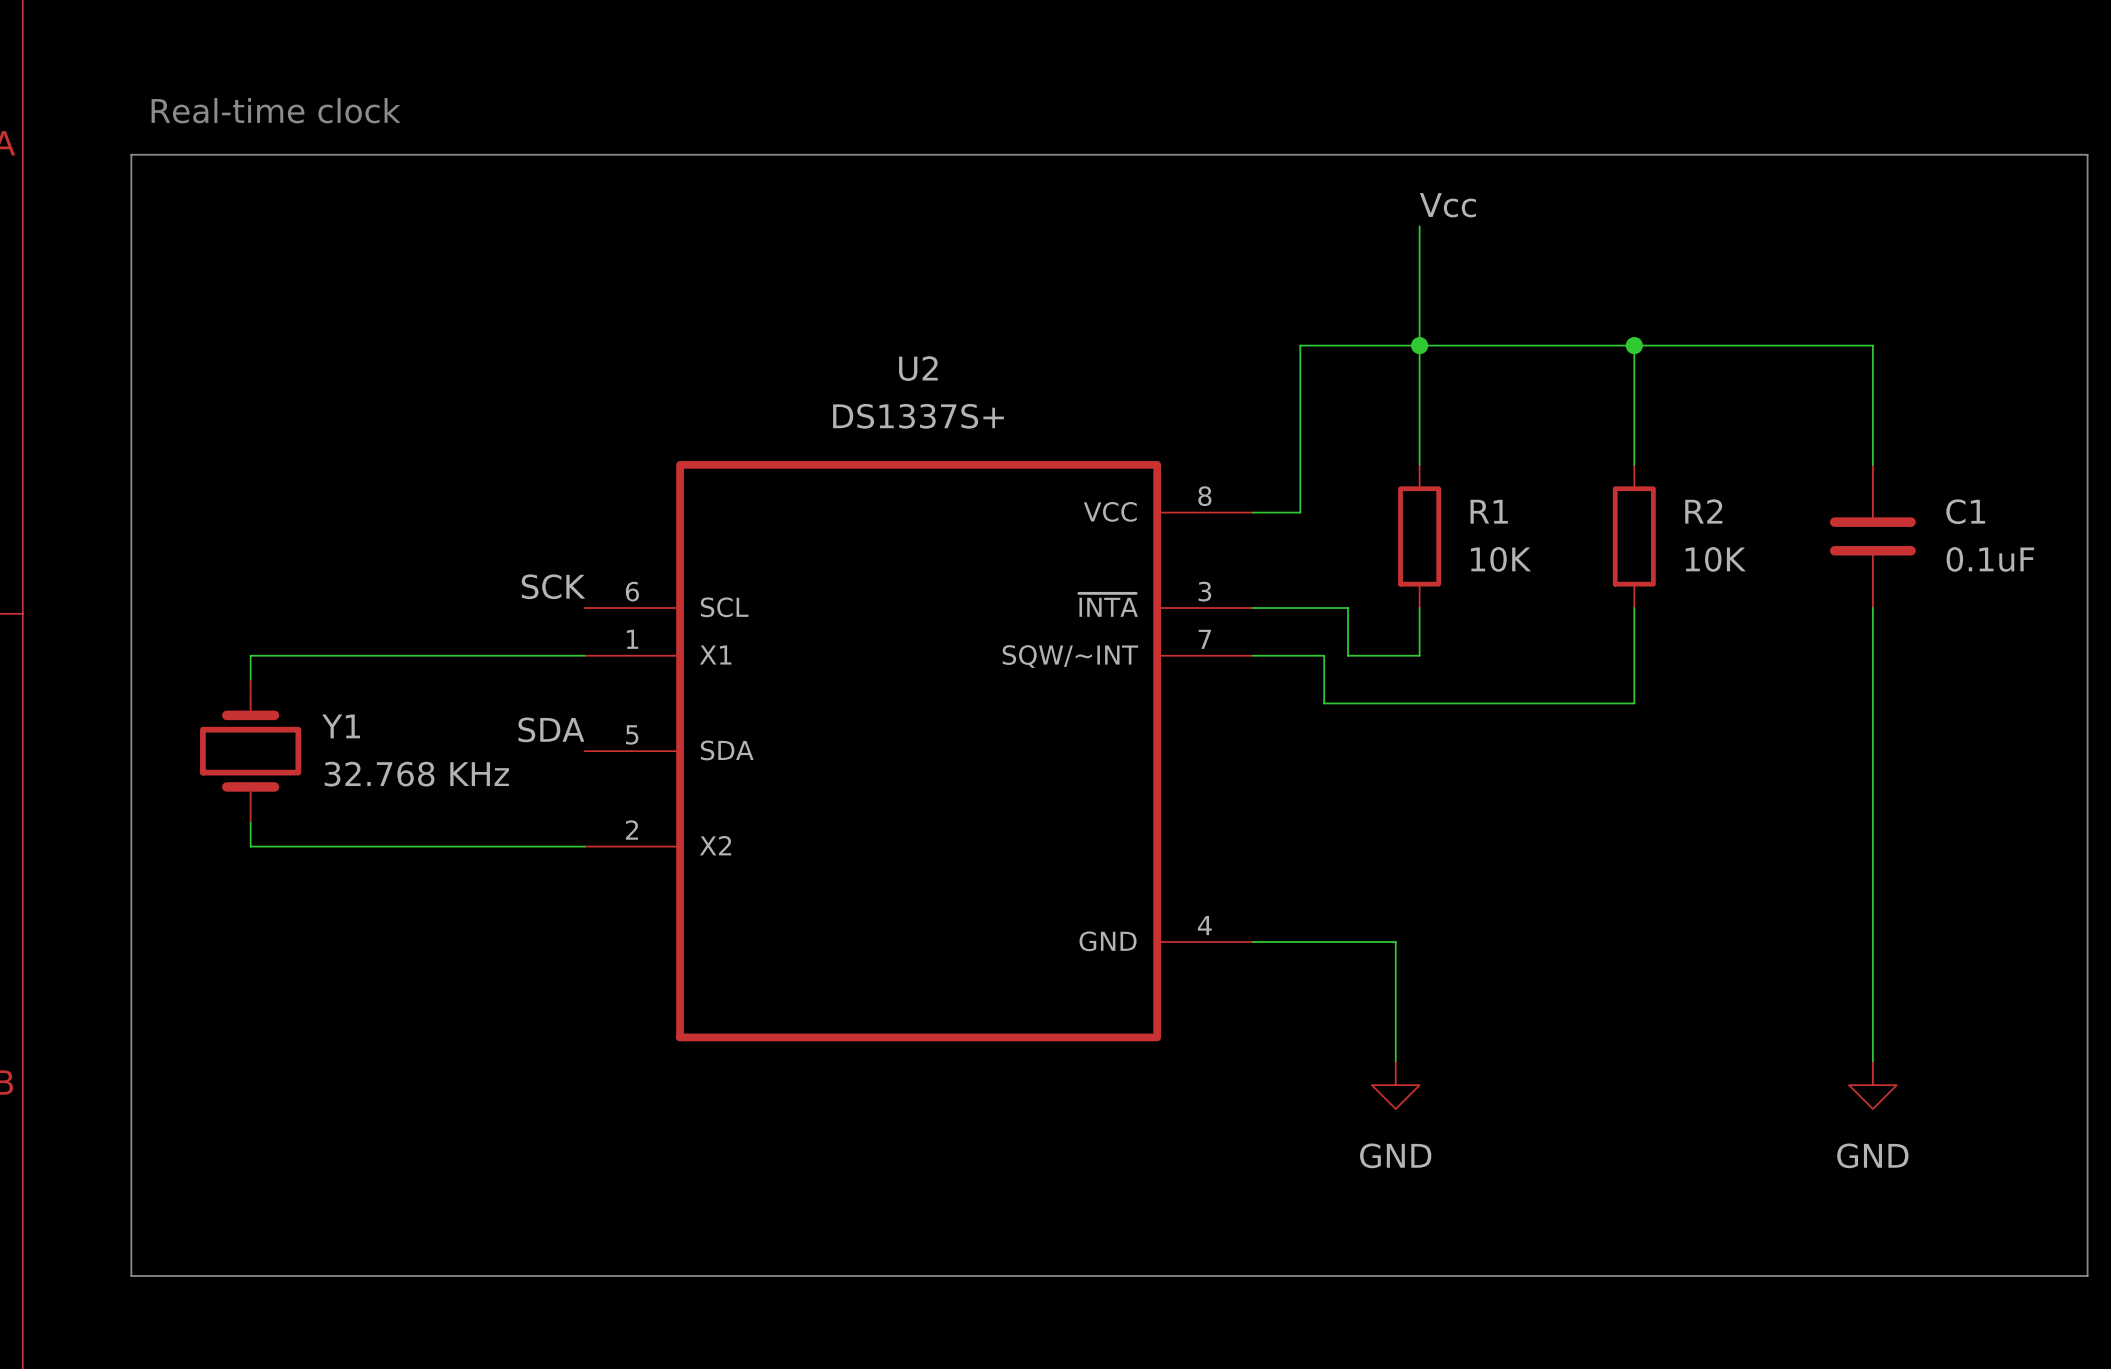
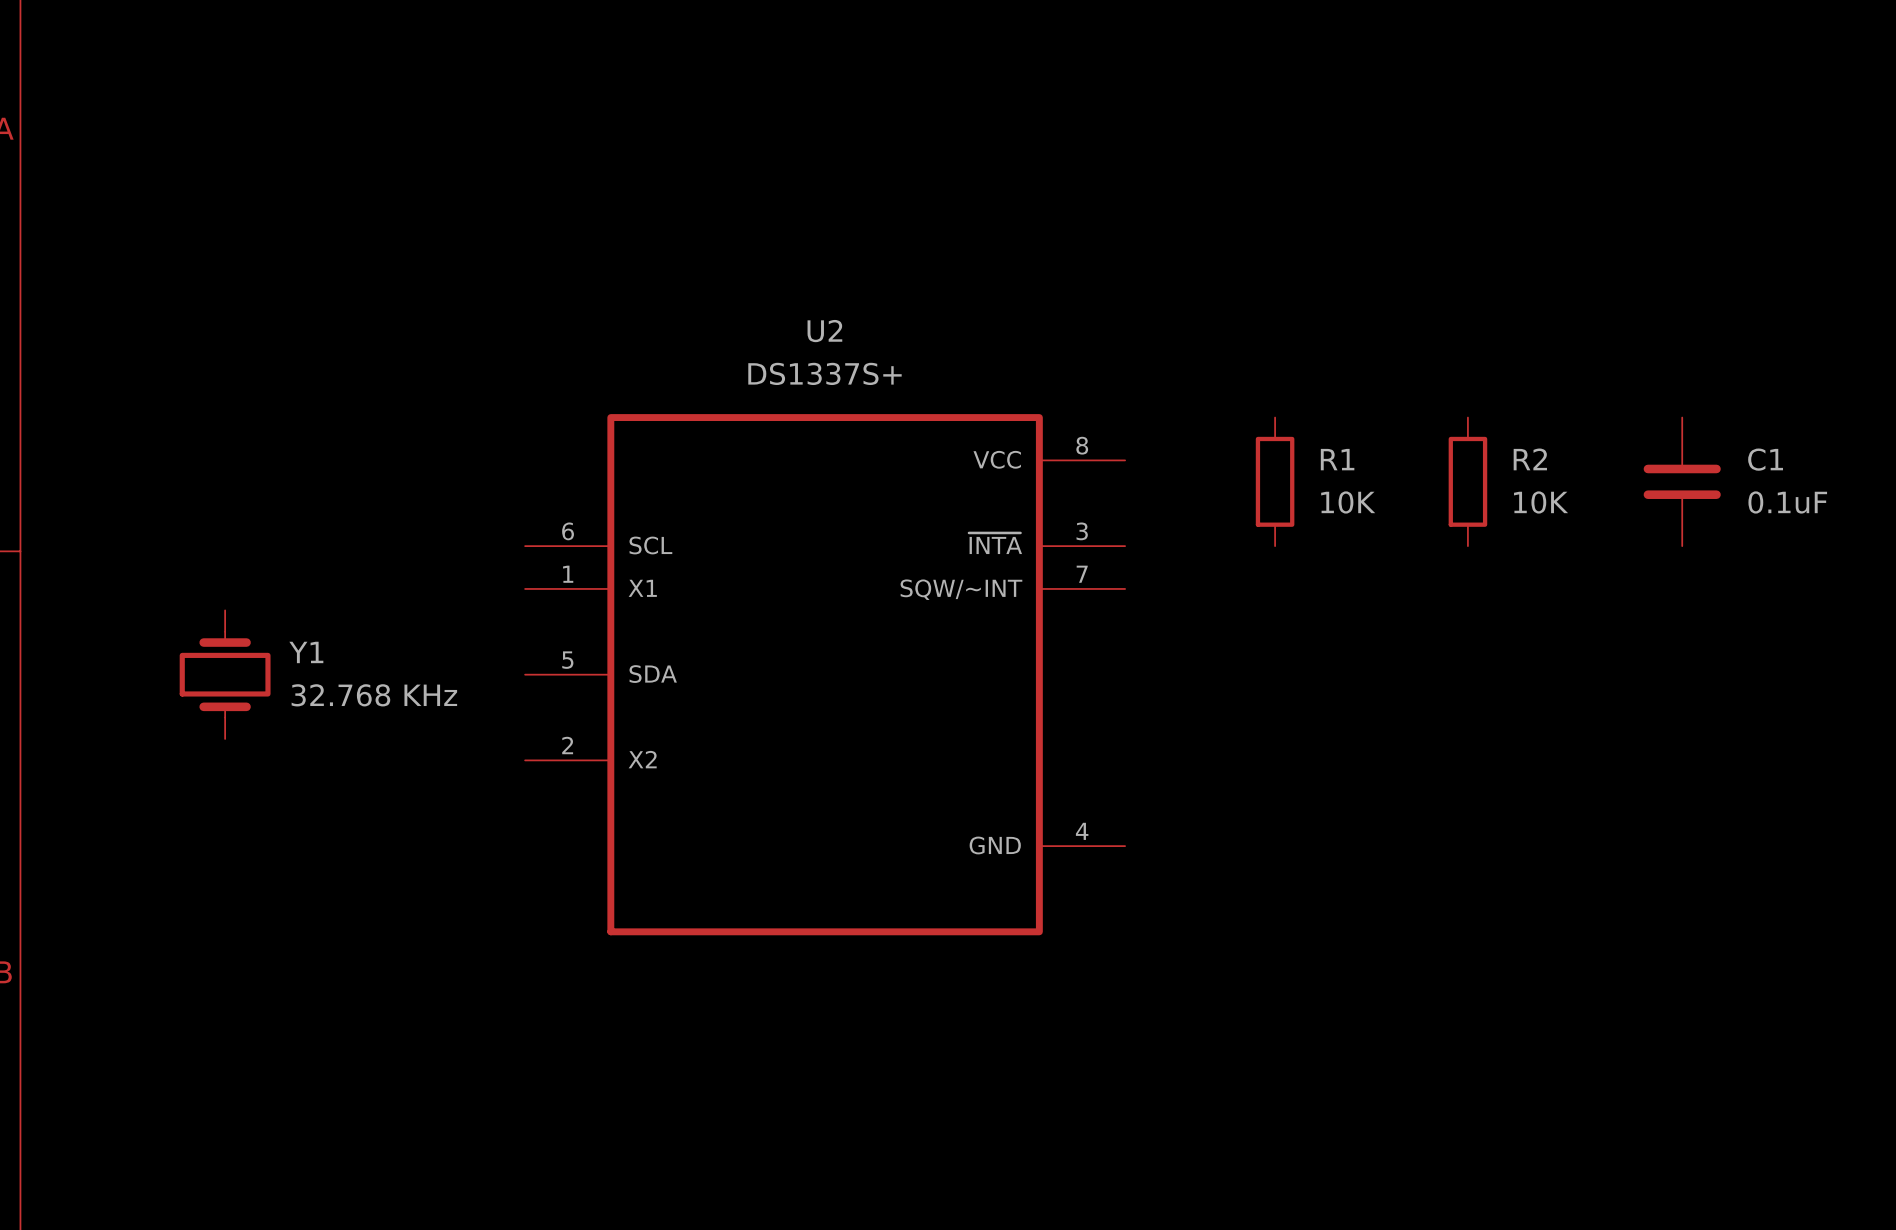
text: Real-time clock (276, 110) -> none
line: (131, 154) (2087, 154) (2087, 1276) (131, 1276) (131, 154) -> none
label: Vcc (1447, 205) -> none
wire: (1419, 226) (1419, 464) -> none
junction: (1419, 345) -> none
wire: (1634, 345) (1634, 464) -> none
junction: (1634, 345) -> none
wire: (1872, 464) (1872, 345) (1300, 345) (1300, 512) (1252, 512) -> none
label: SCK (553, 586) -> none
wire: (1252, 608) (1348, 608) (1348, 655) (1419, 655) (1419, 608) -> none
wire: (1634, 608) (1634, 703) (1324, 703) (1324, 655) (1252, 655) -> none
wire: (1872, 608) (1872, 1061) -> none
wire: (584, 655) (250, 655) (250, 679) -> none
label: SDA (551, 729) -> none
wire: (250, 822) (250, 846) (584, 846) -> none
wire: (1252, 942) (1395, 942) (1395, 1061) -> none
power symbol: GND (1395, 1085) -> none
power symbol: GND (1872, 1085) -> none

